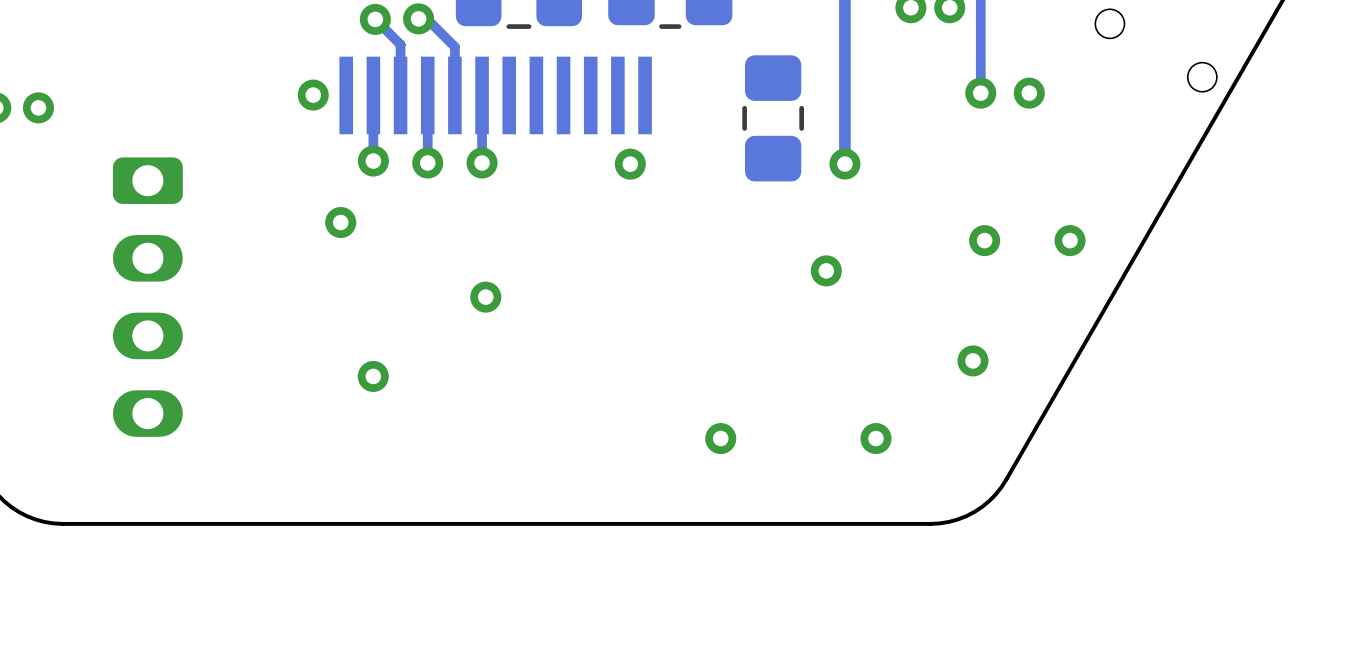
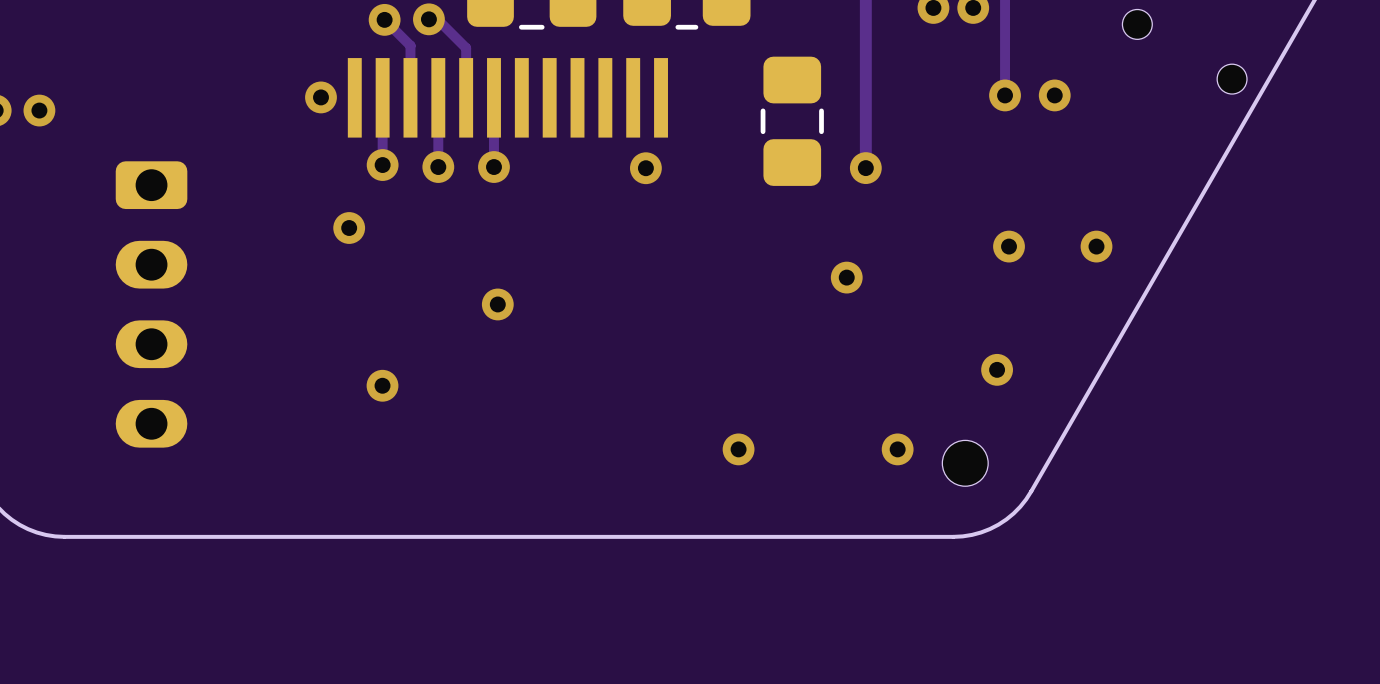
part: none -> (965, 463)

